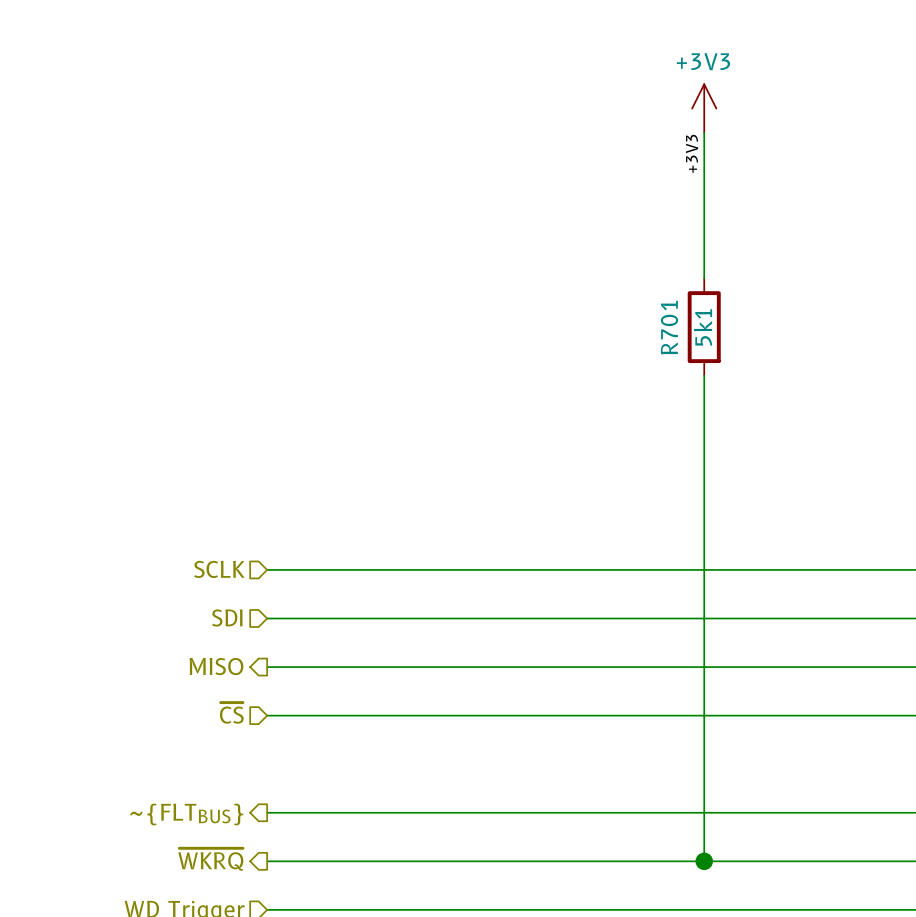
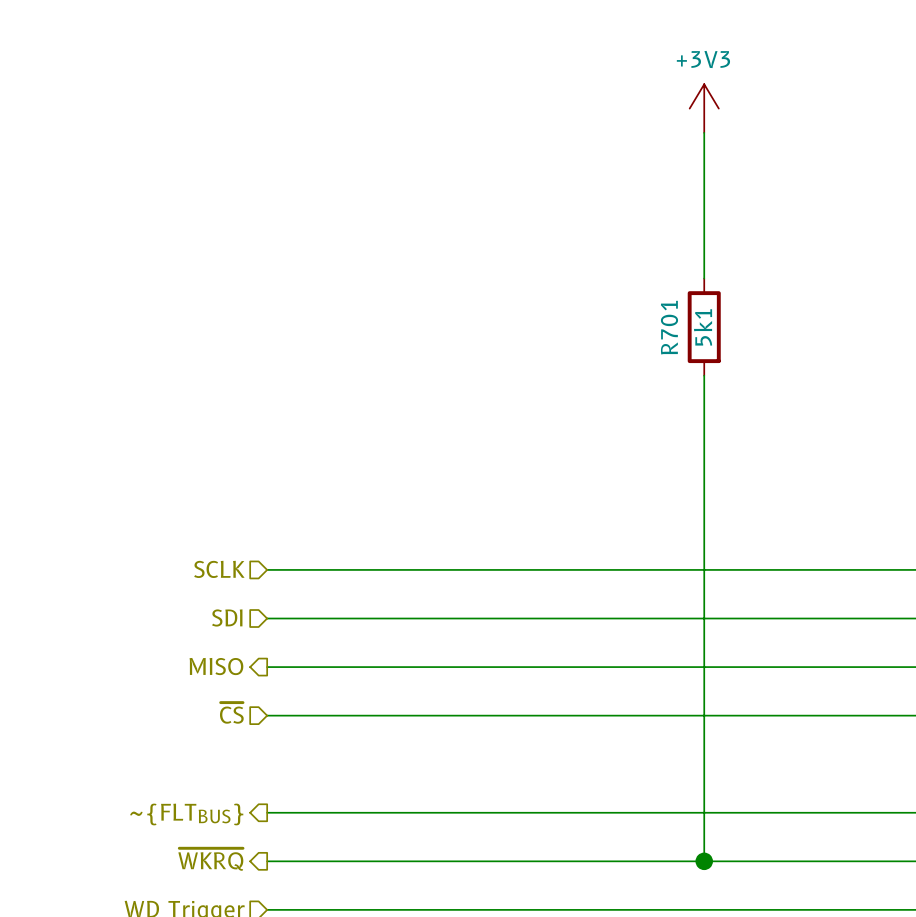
part: +3V3 (704, 108) -> none
power symbol: none -> +3V3 (704, 108)
label: +3V3 (692, 153) -> none

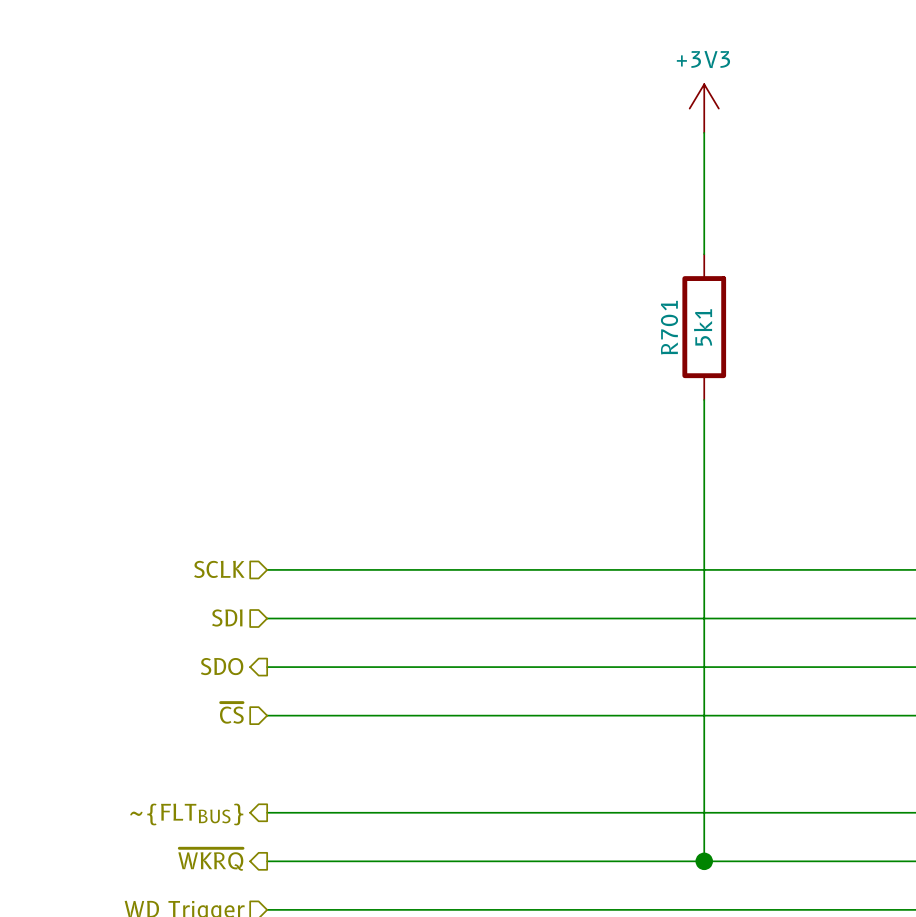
R701 symbol: [687, 278, 721, 376] -> [682, 254, 727, 400]
hierarchical label: MISO (216, 666) -> SDO (222, 666)

